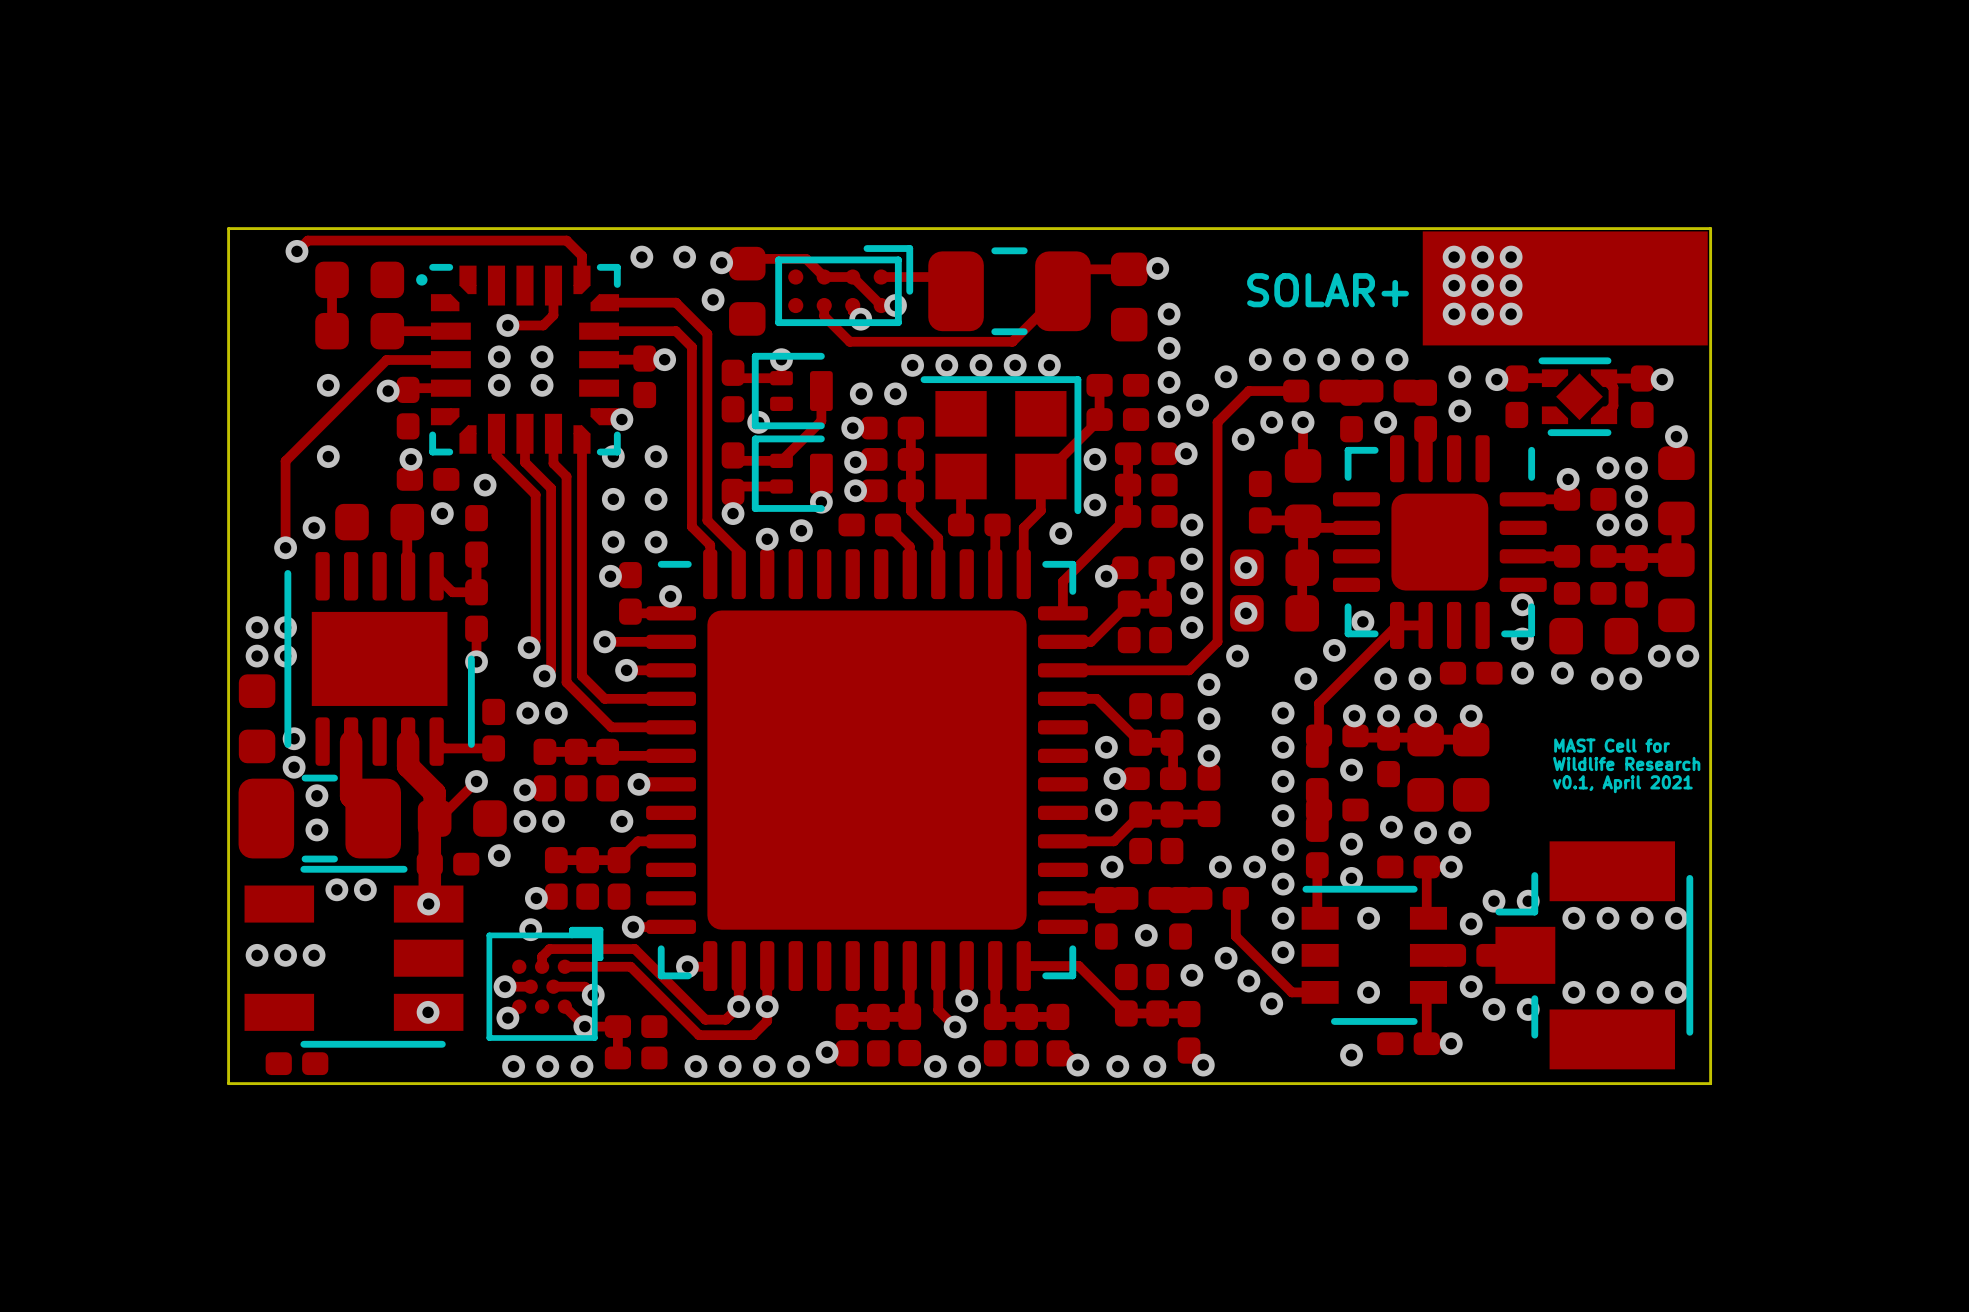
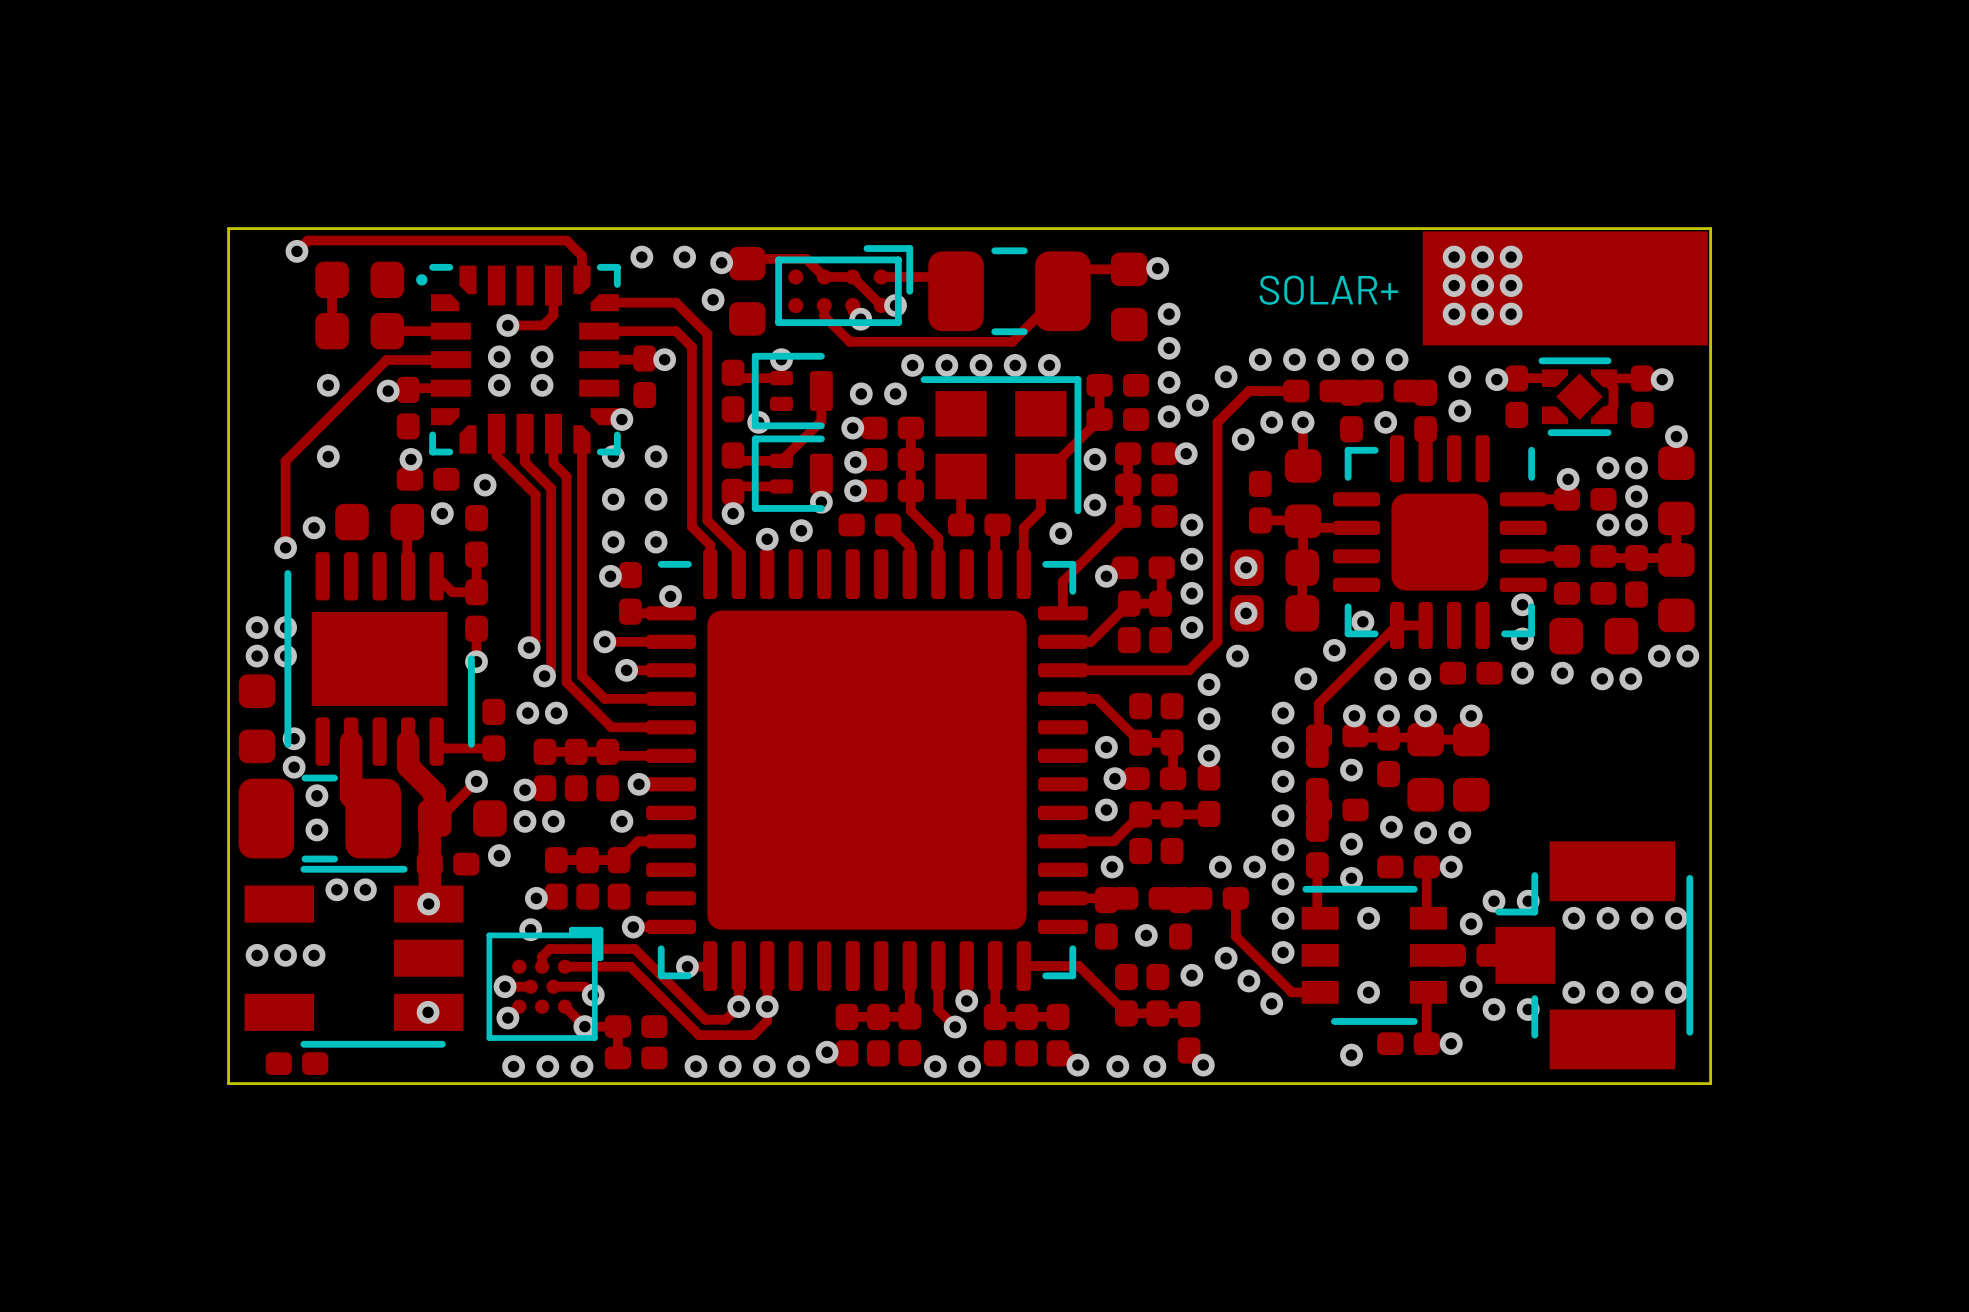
text: MAST Cell for (1612, 745) -> none
text: Wildlife Research (1626, 763) -> none
text: v0.1, April 2021 (1622, 784) -> none

